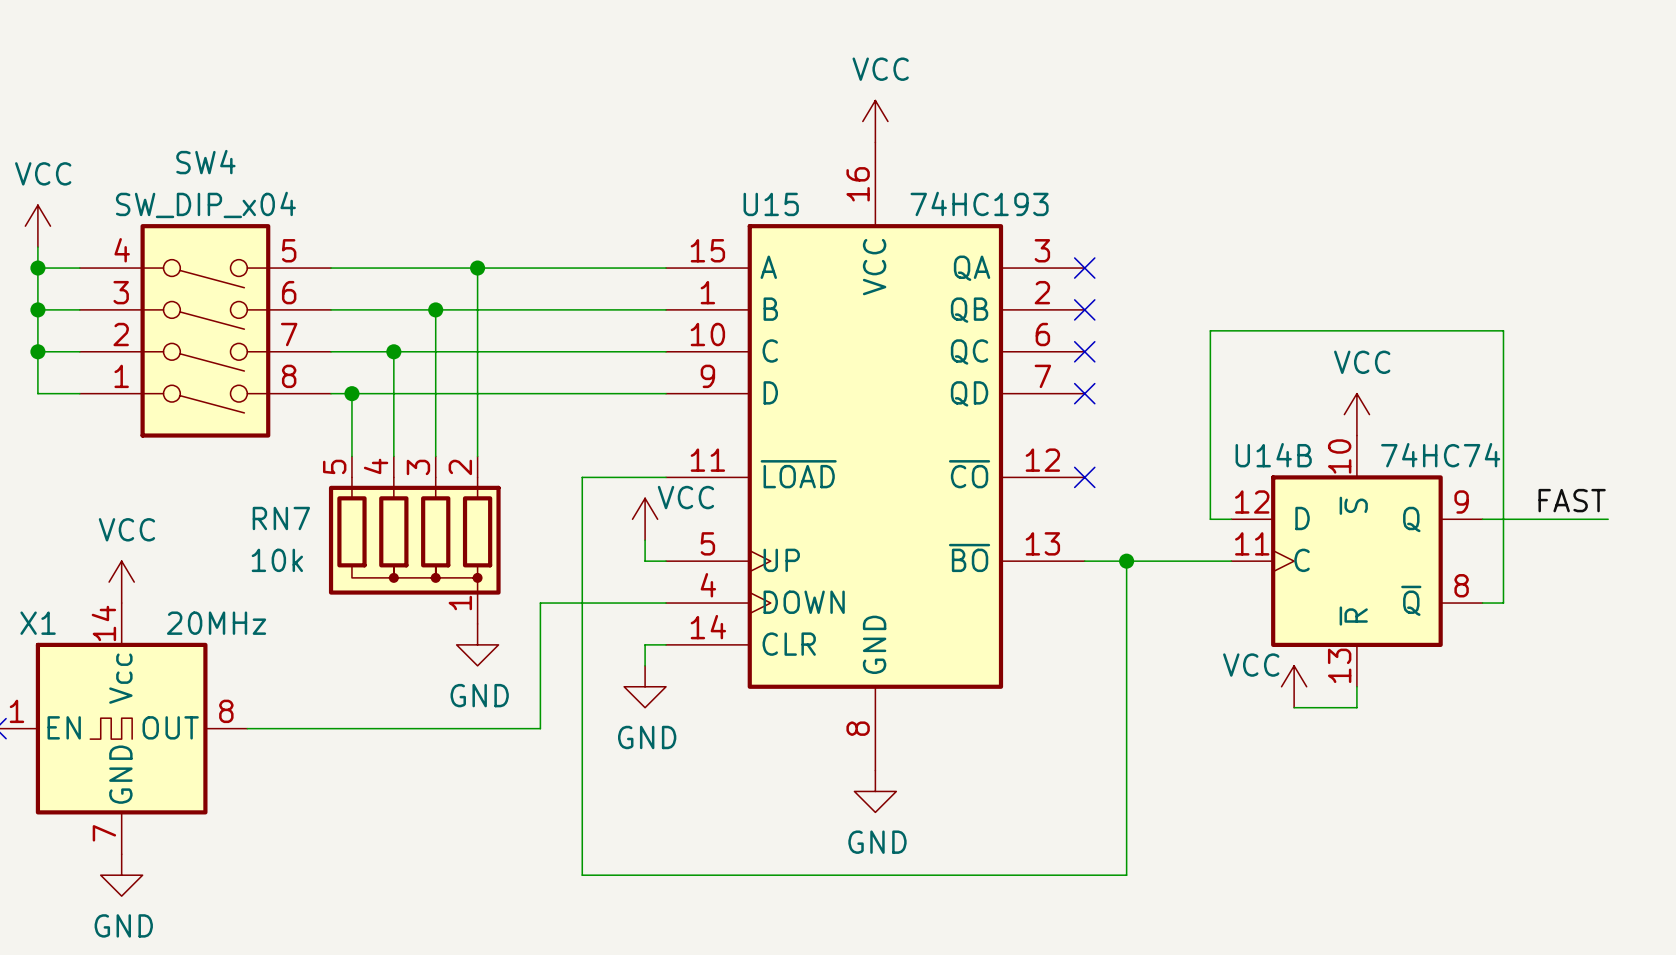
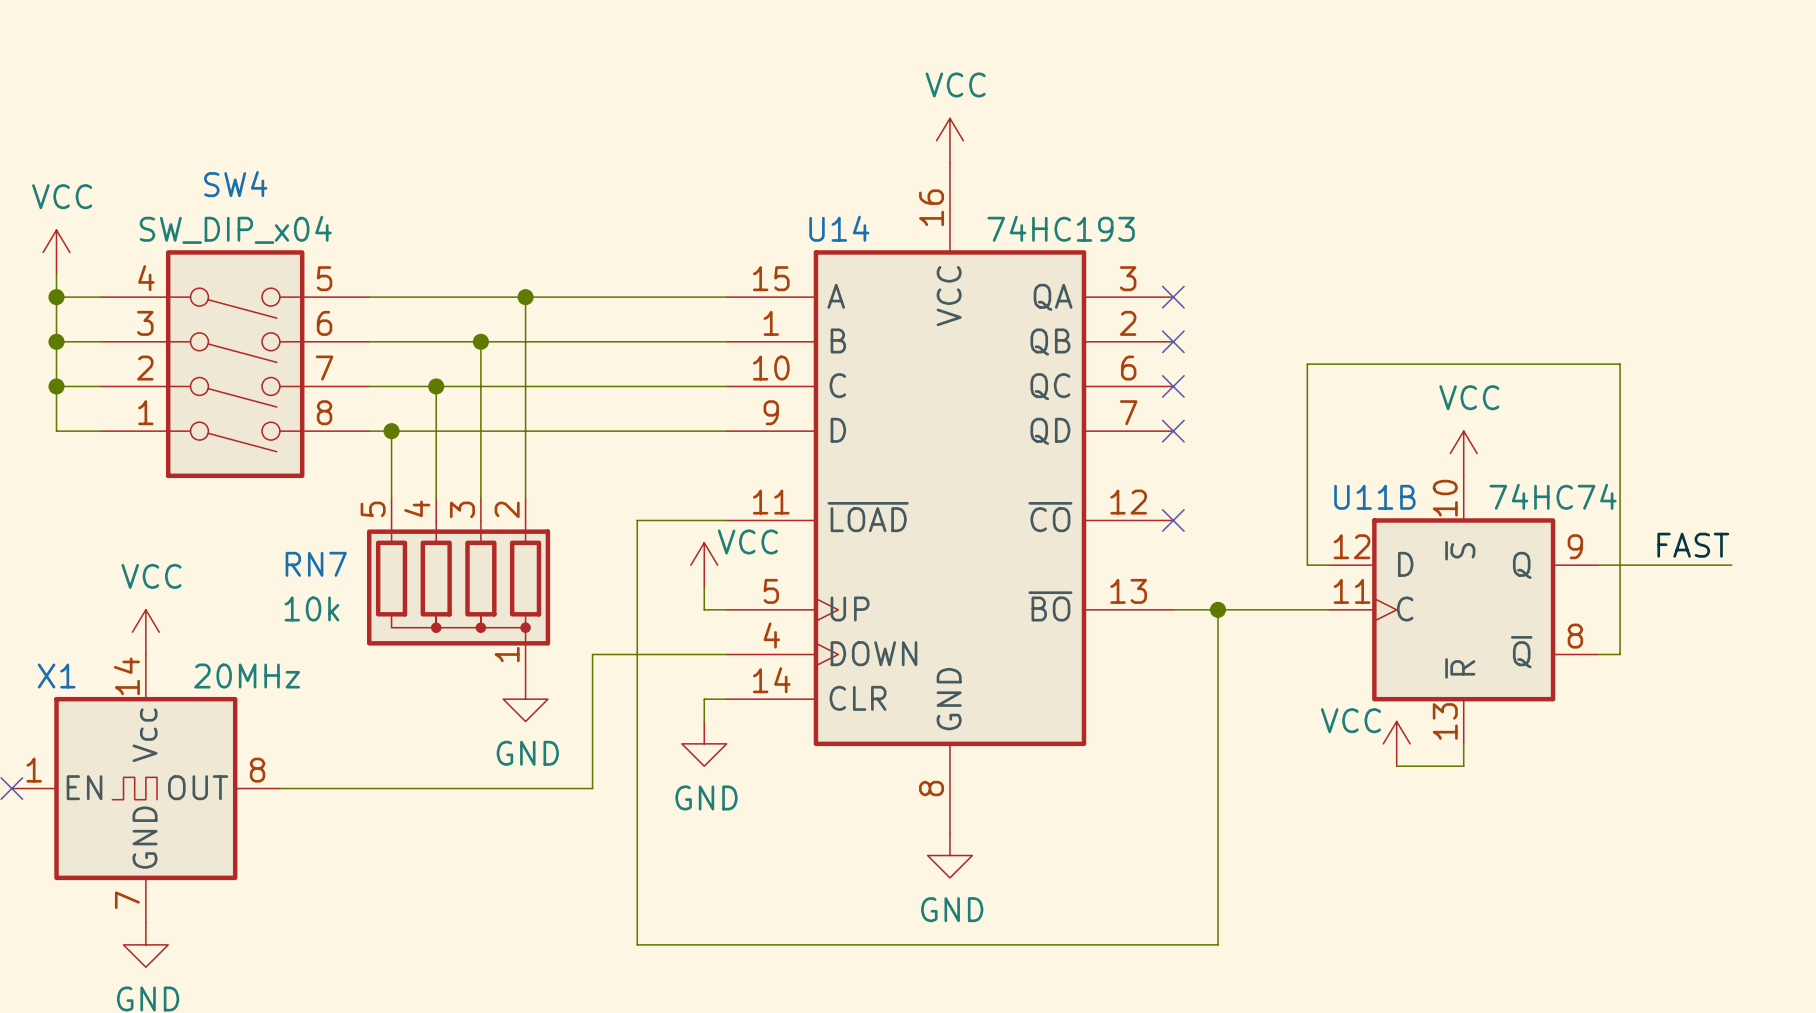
U15 name: U15 (771, 204) -> U14 (839, 228)
U14B name: U14B (1273, 455) -> U11B (1374, 497)

